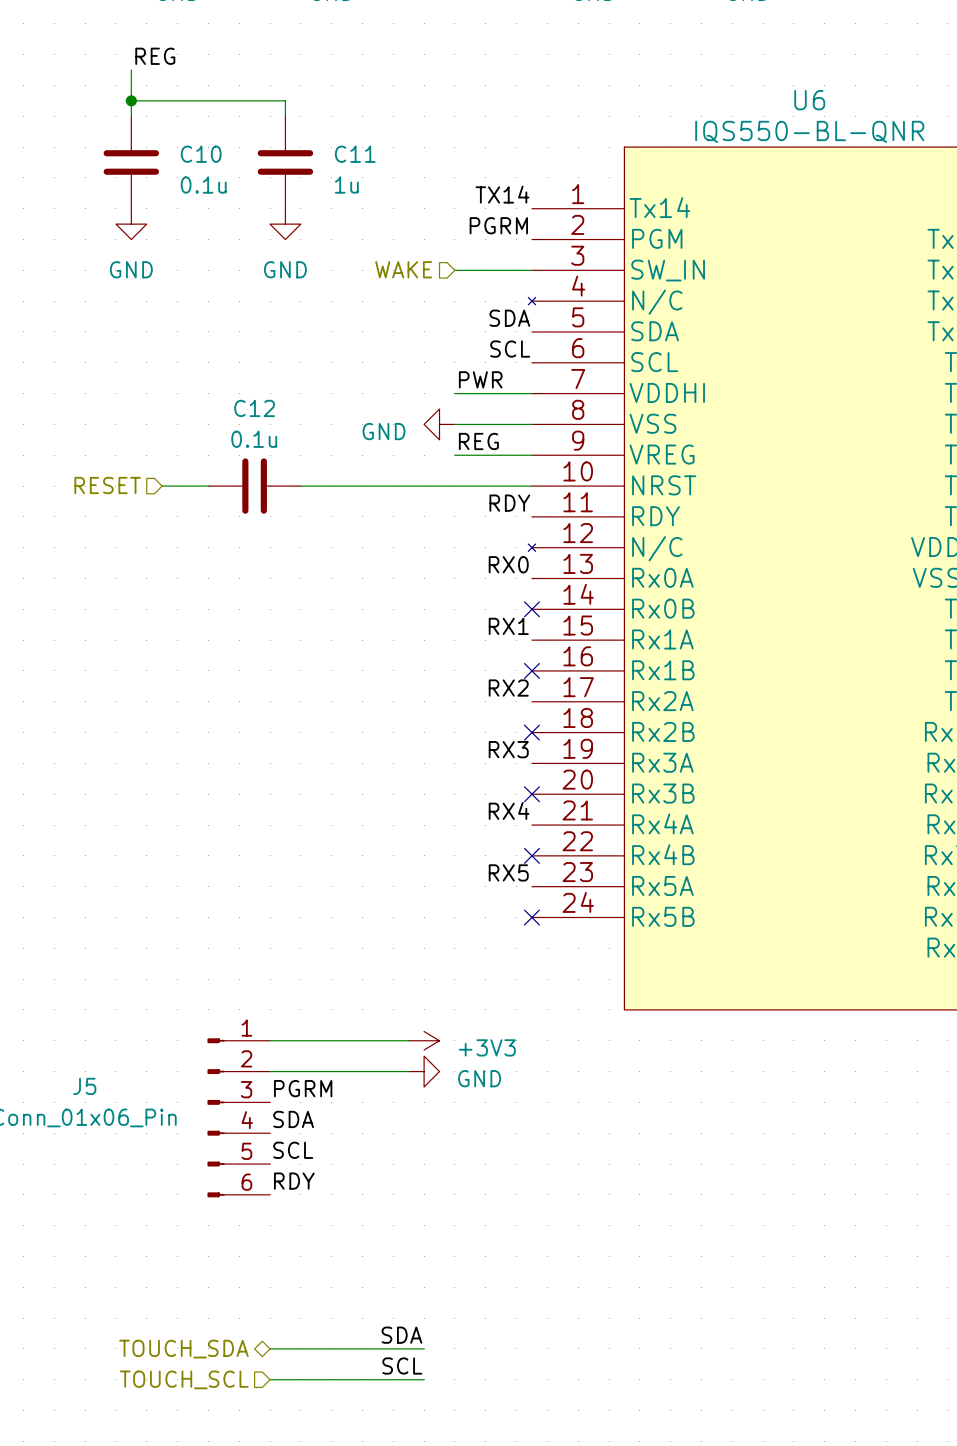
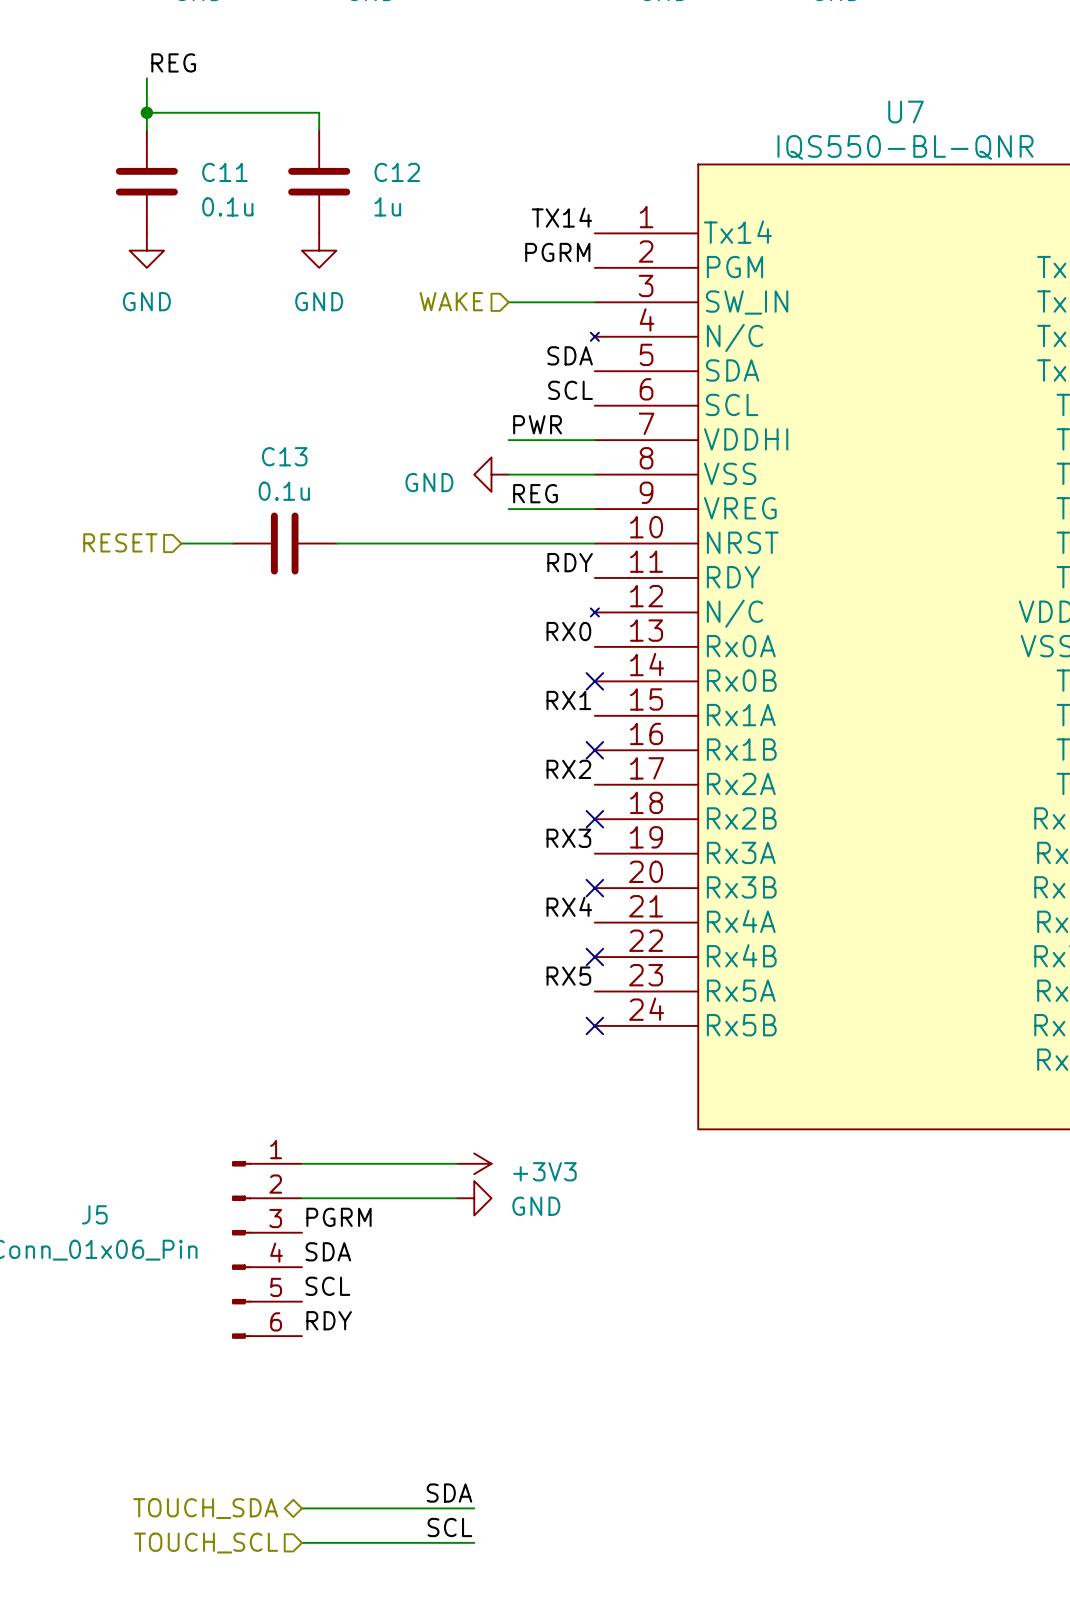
U6 name: U6 (809, 100) -> U7 (905, 112)
C10 name: C10 (201, 154) -> C11 (224, 172)
C11 name: C11 (355, 154) -> C12 (397, 172)
C12 name: C12 (254, 408) -> C13 (284, 456)

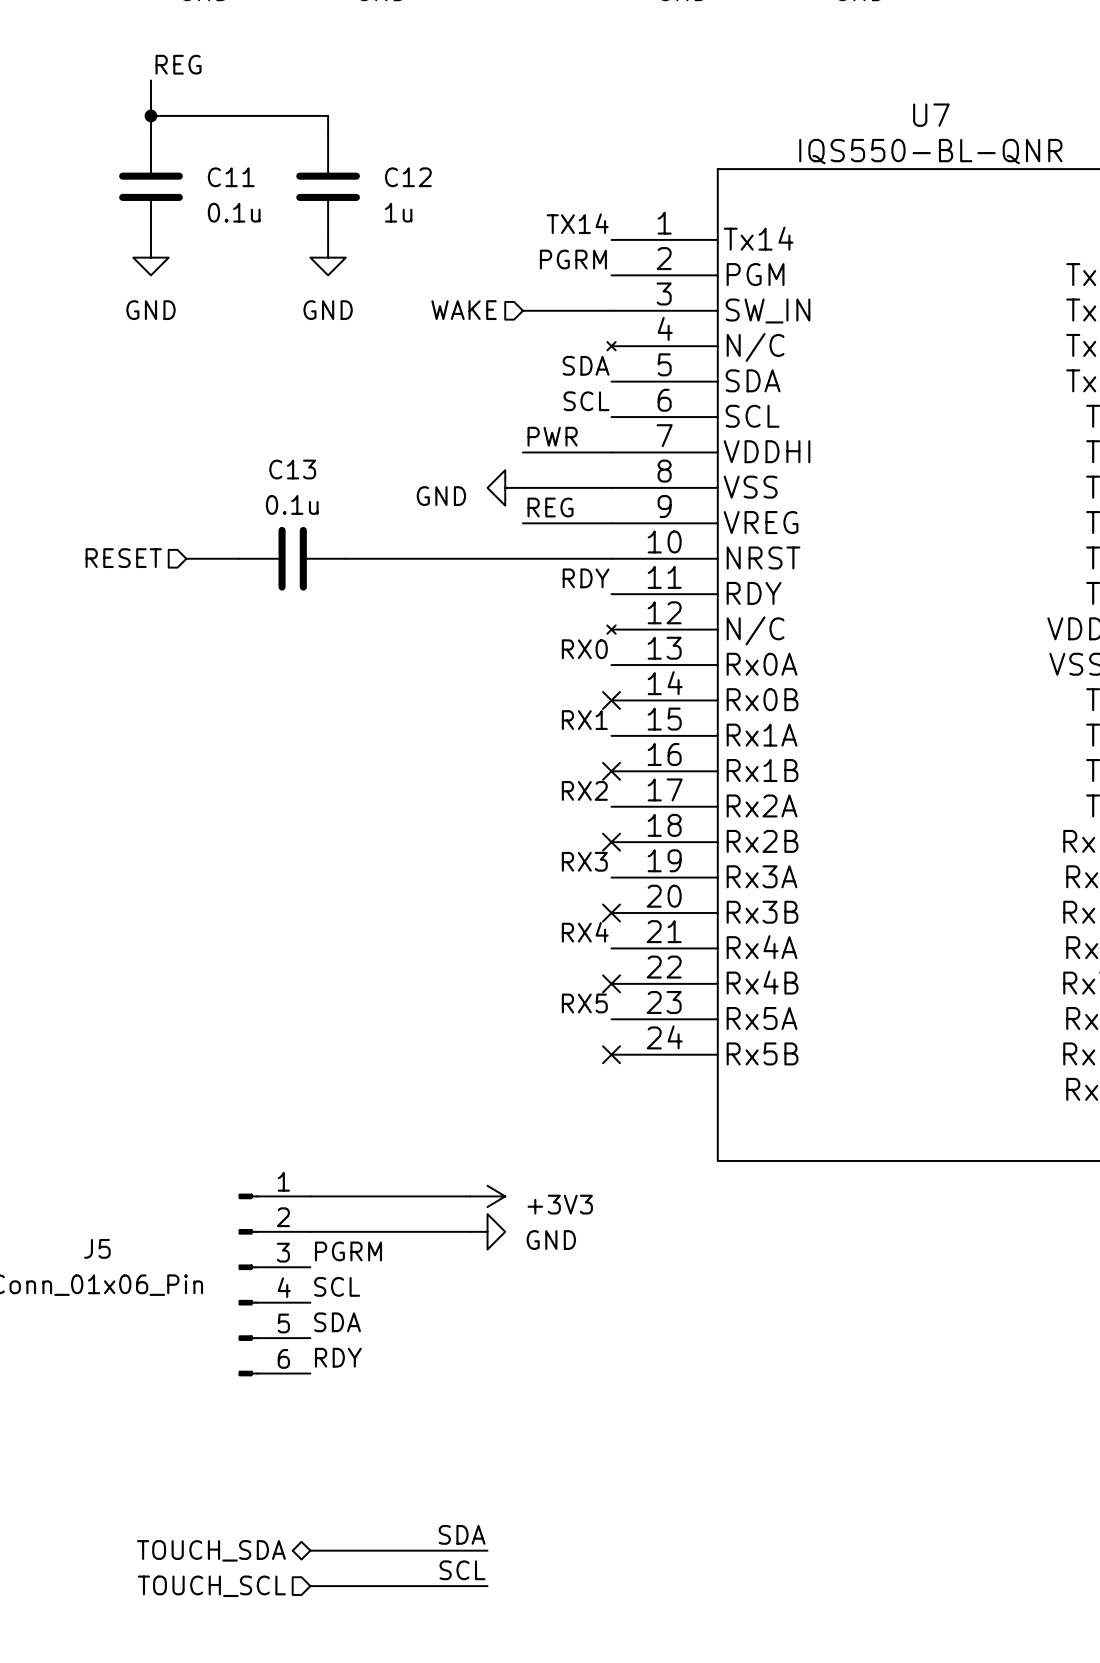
label: SDA (328, 1251) -> SCL (337, 1286)
label: SCL (327, 1286) -> SDA (337, 1322)

